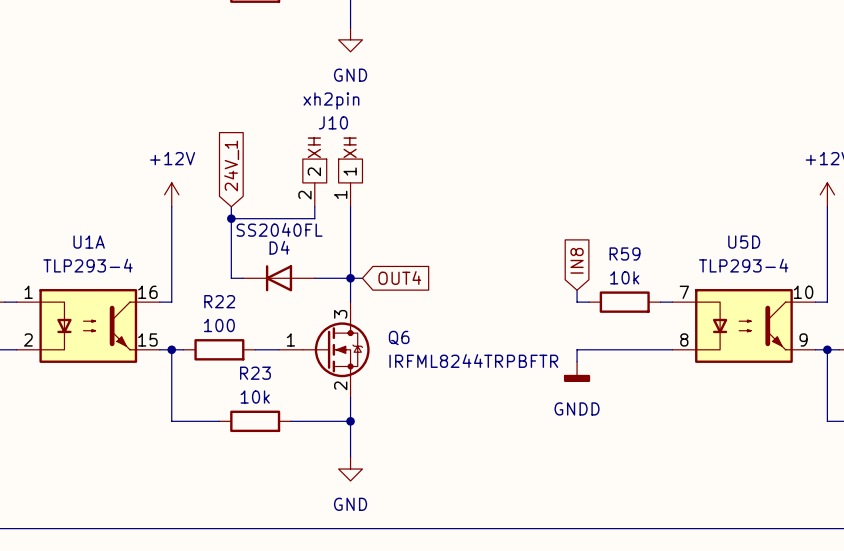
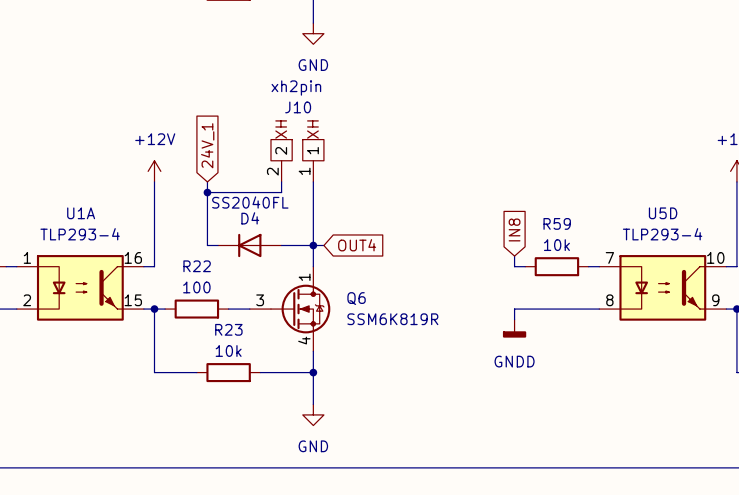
Q6 pin number: 3 (340, 314) -> 1 (304, 277)
Q6 pin number: 1 (290, 339) -> 3 (260, 300)
Q6 value: IRFML8244TRPBFTR (473, 361) -> SSM6K819R (392, 319)
Q6 pin number: 2 (340, 385) -> 4 (304, 340)

